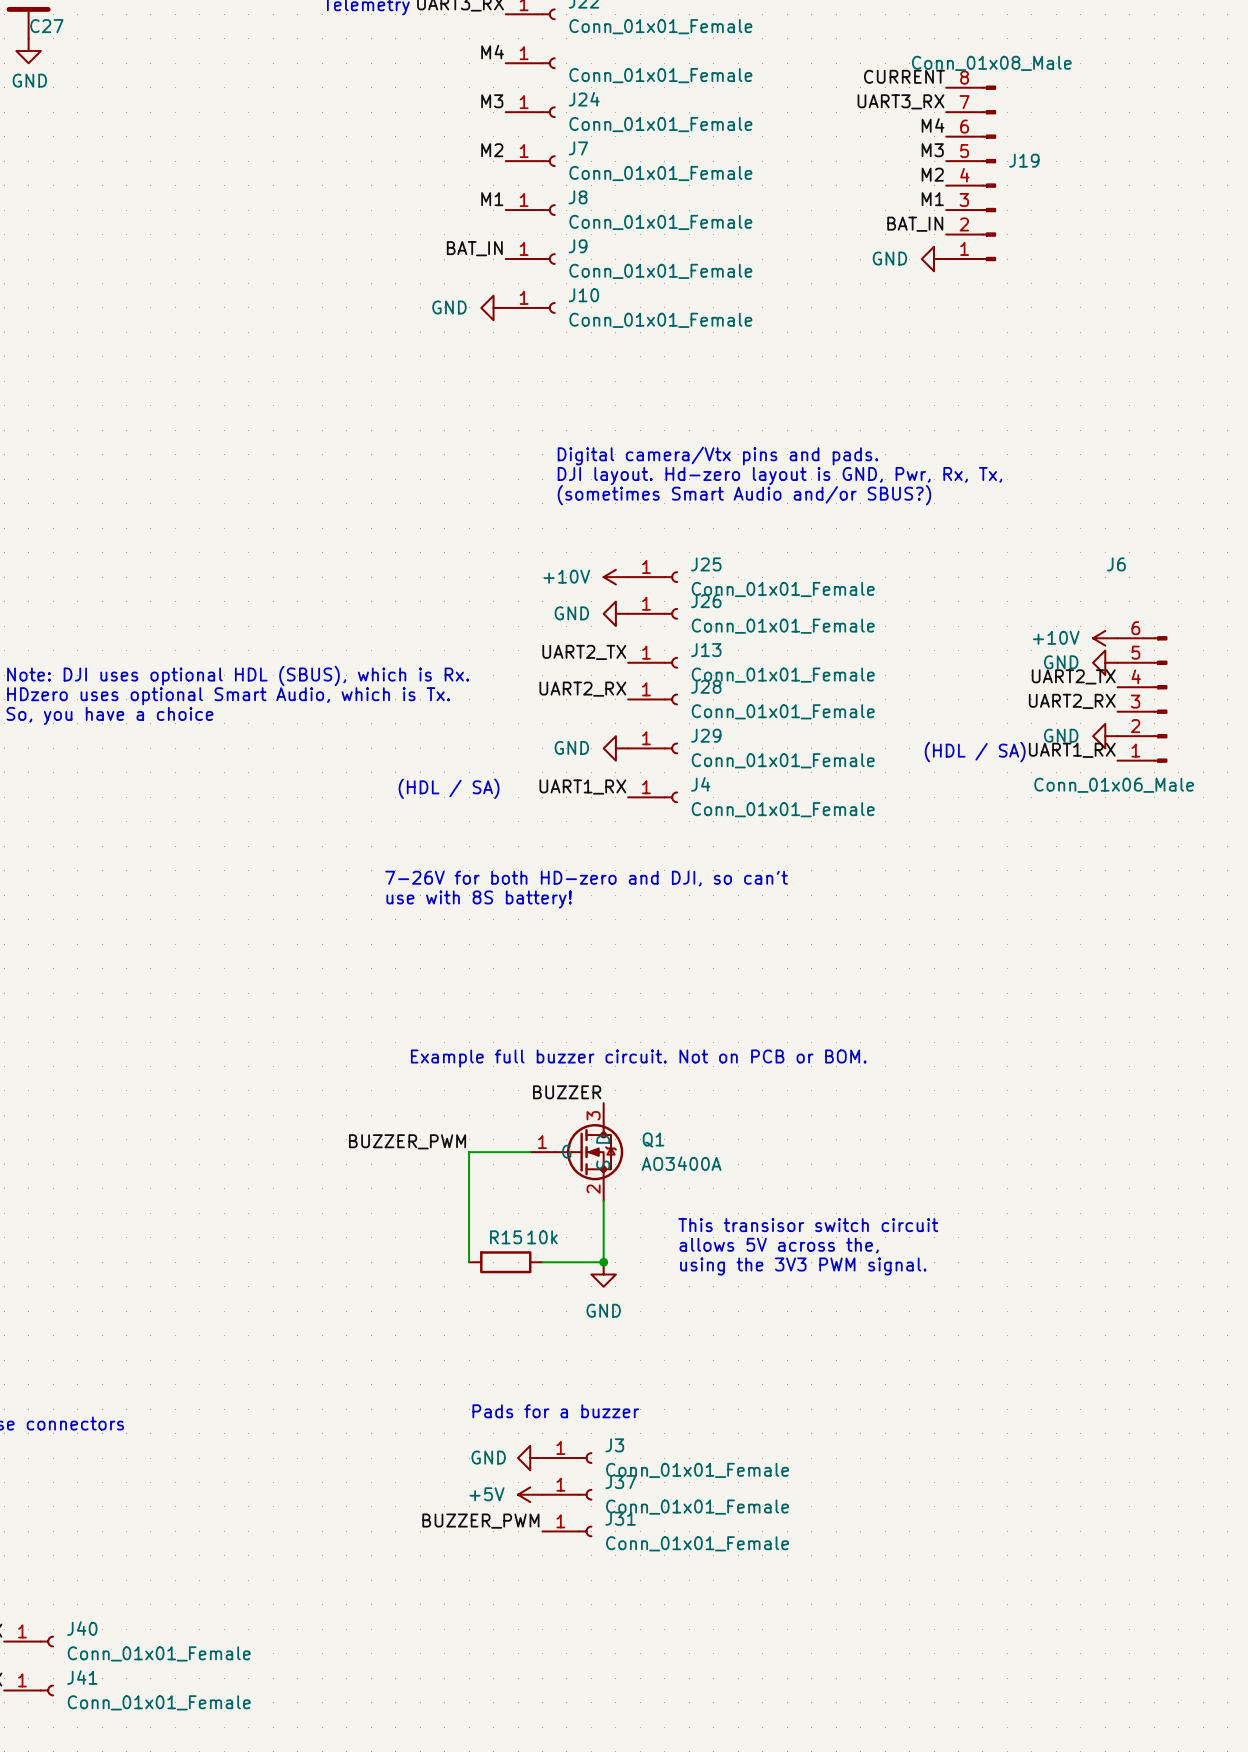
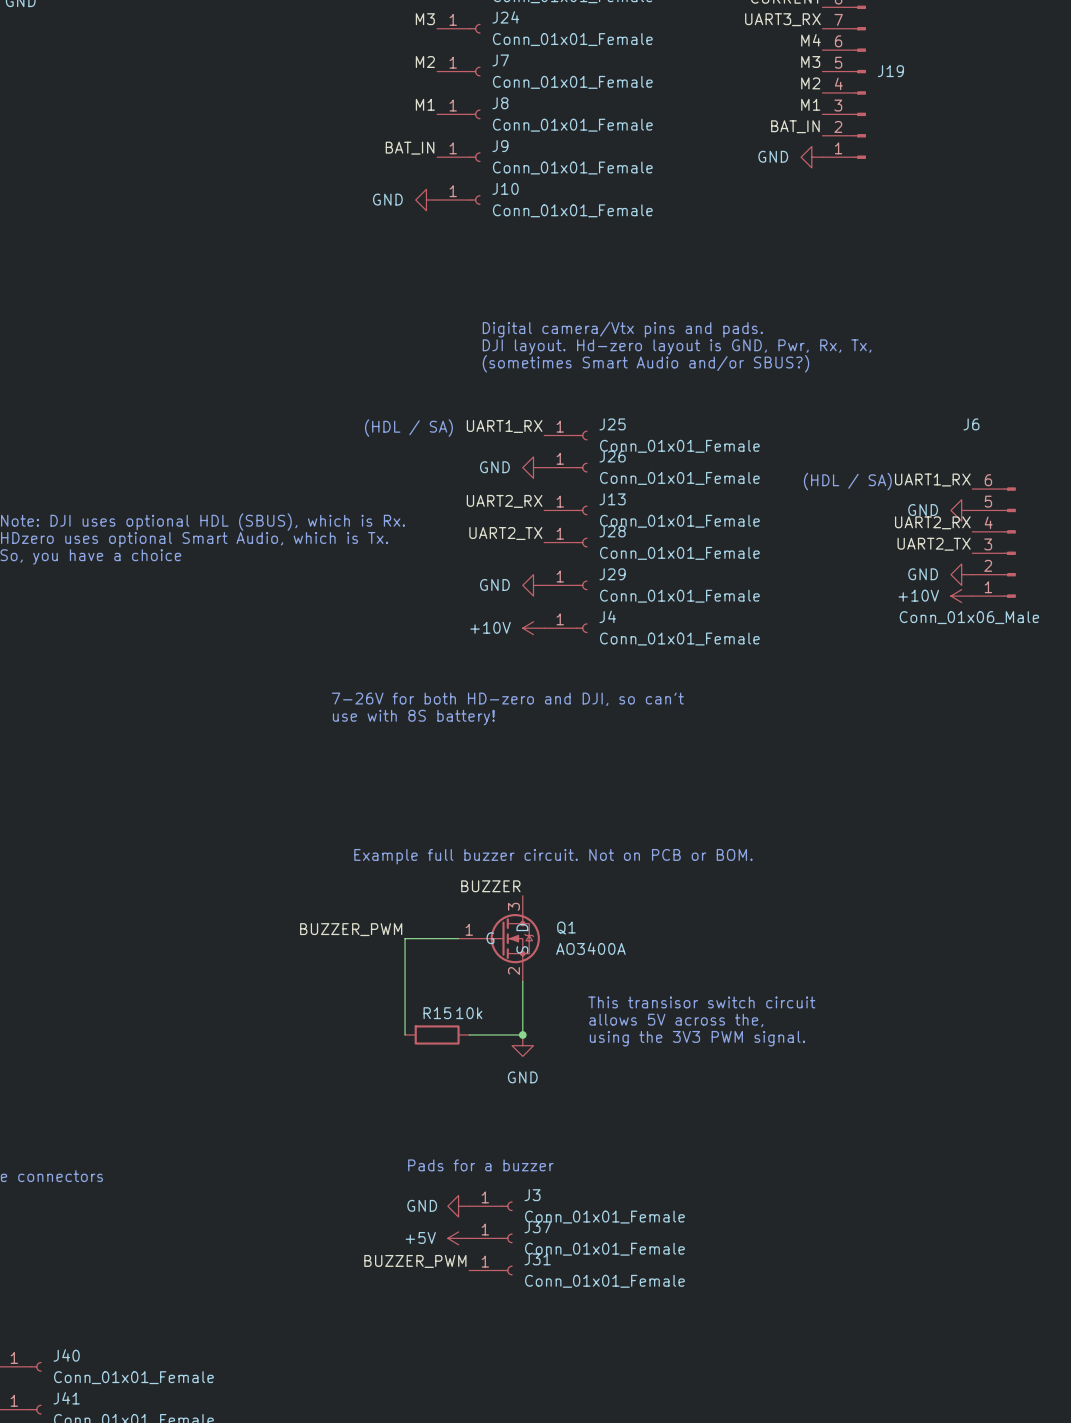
power symbol position: +10V (615, 577) -> +10V (533, 628)
power symbol position: +10V (1105, 638) -> +10V (961, 596)
label: UART2_TX (584, 652) -> UART2_RX (504, 501)
label: UART2_TX (1073, 676) -> UART2_RX (932, 522)
label: UART2_RX (582, 689) -> UART2_TX (505, 533)
label: UART2_RX (1072, 701) -> UART2_TX (934, 544)
label position: UART1_RX (1072, 750) -> UART1_RX (932, 480)
text position: (HDL / SA) (975, 752) -> (HDL / SA) (847, 481)
label position: UART1_RX (582, 787) -> UART1_RX (504, 426)
text position: (HDL / SA) (449, 788) -> (HDL / SA) (408, 428)

